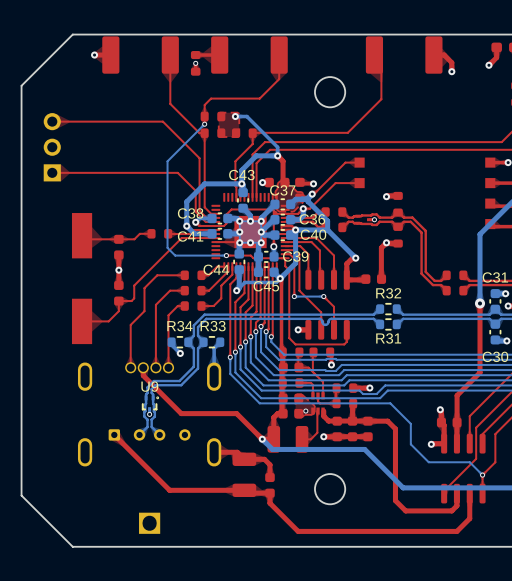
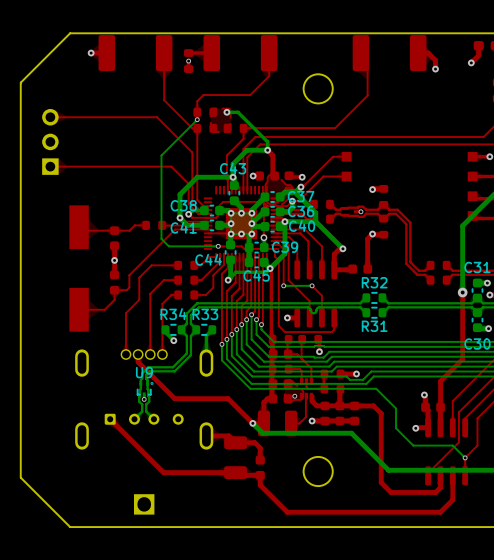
C37 name position: C37 (282, 190) -> C37 (301, 196)

